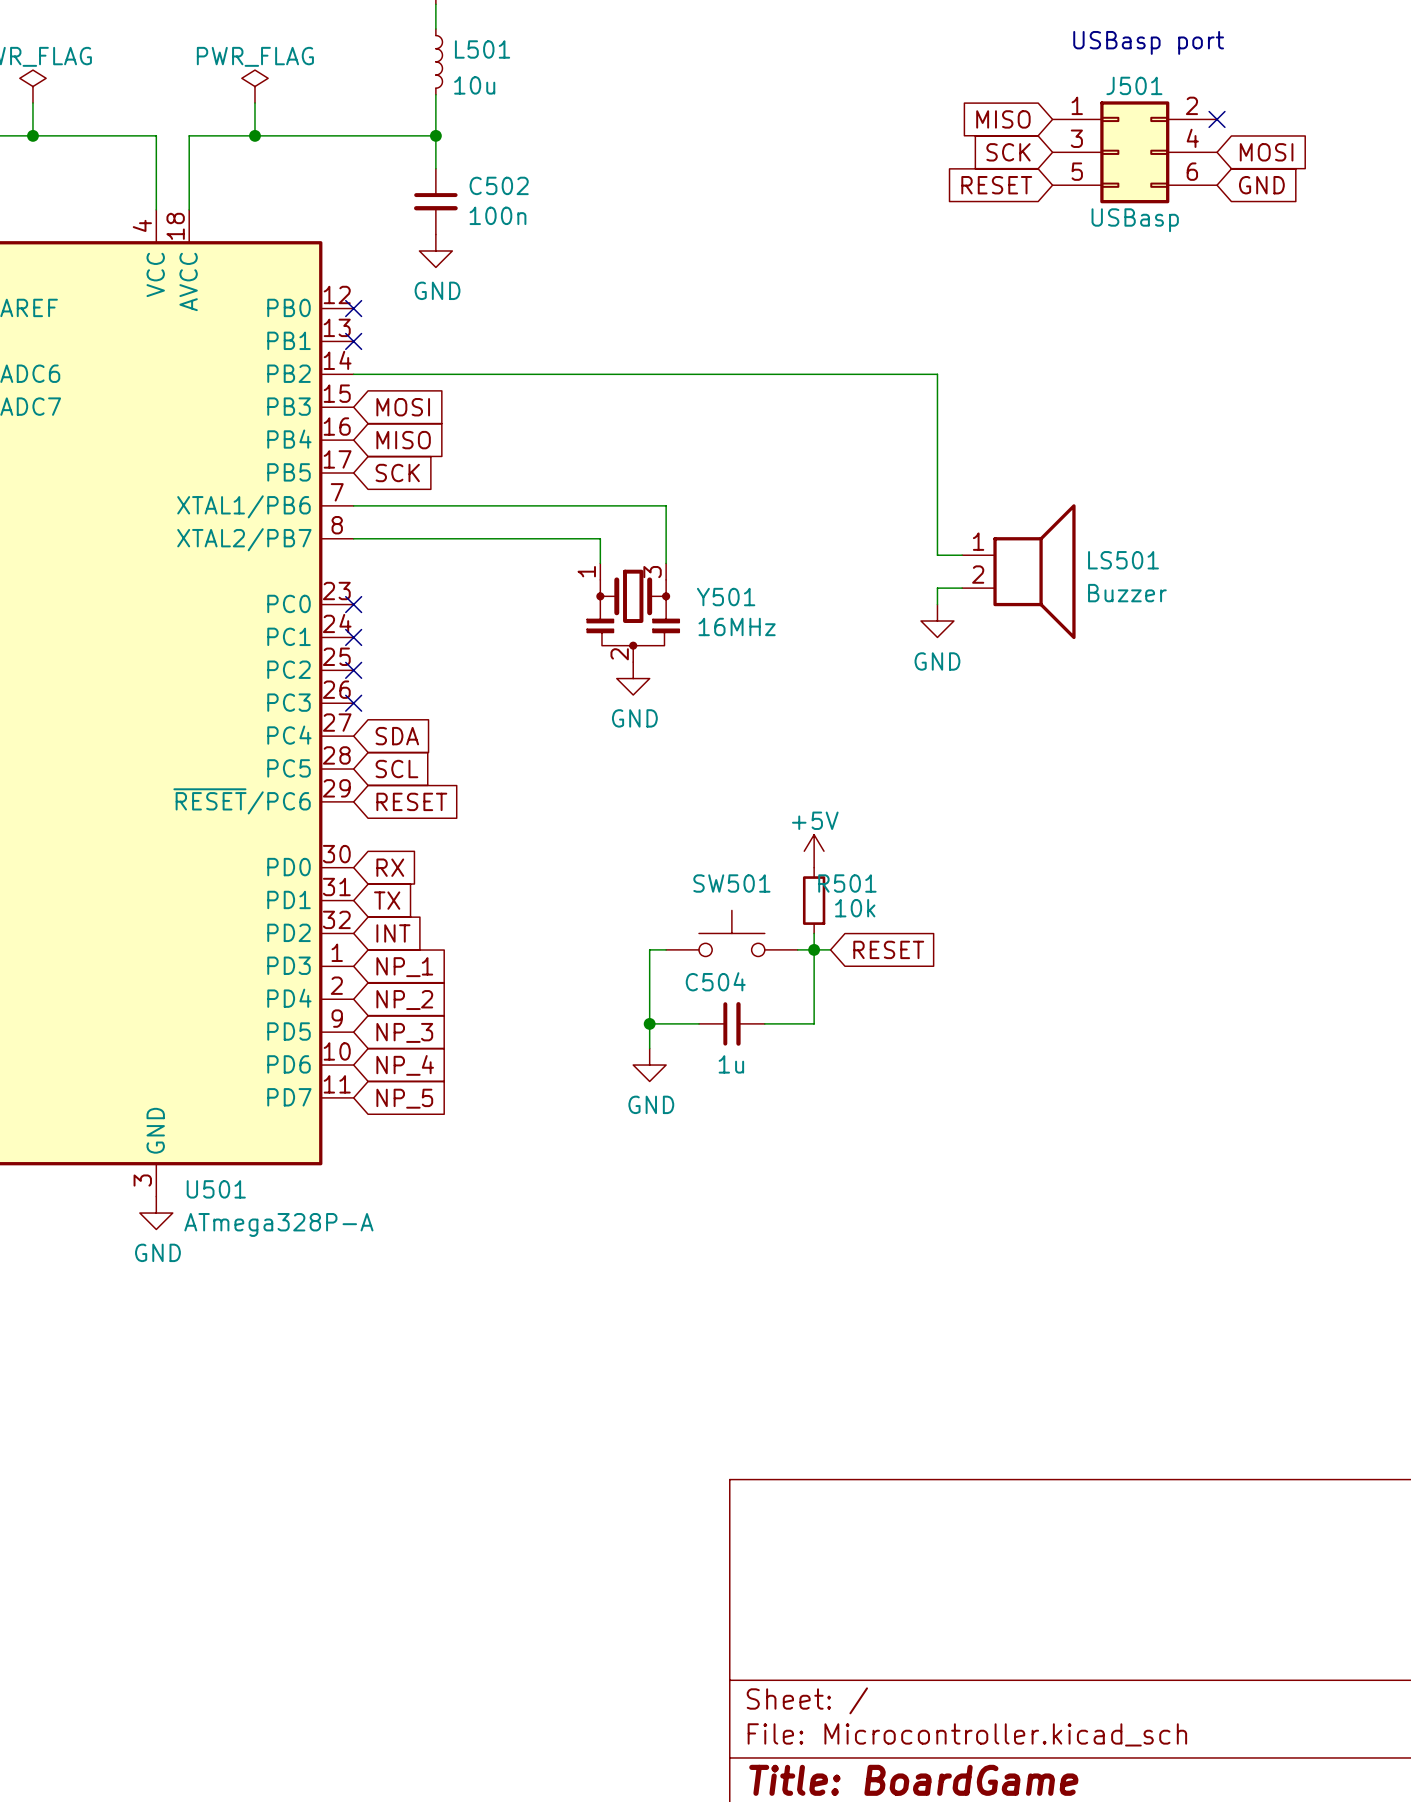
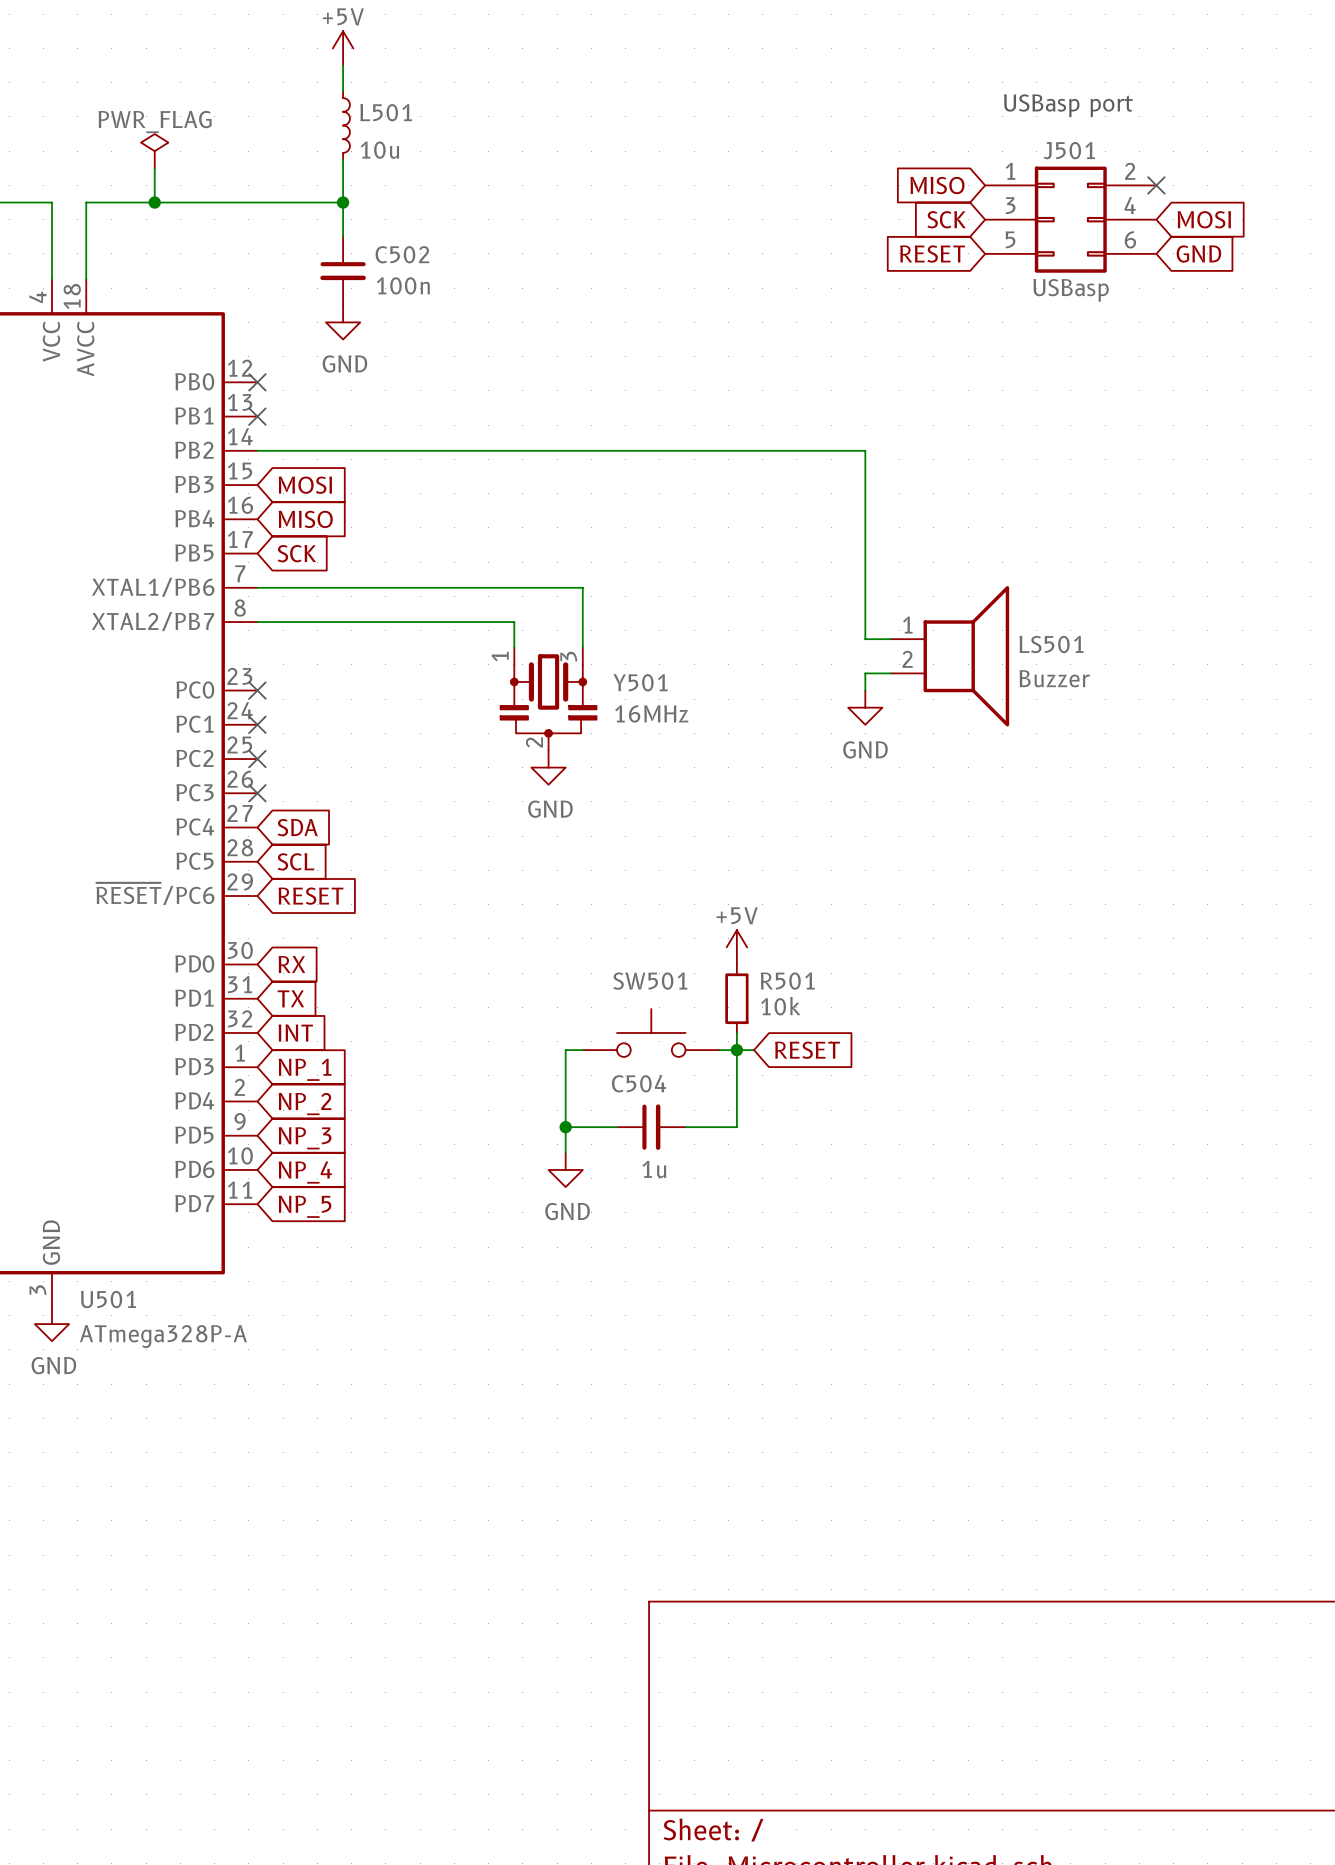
R501 name position: R501 (847, 883) -> R501 (787, 981)

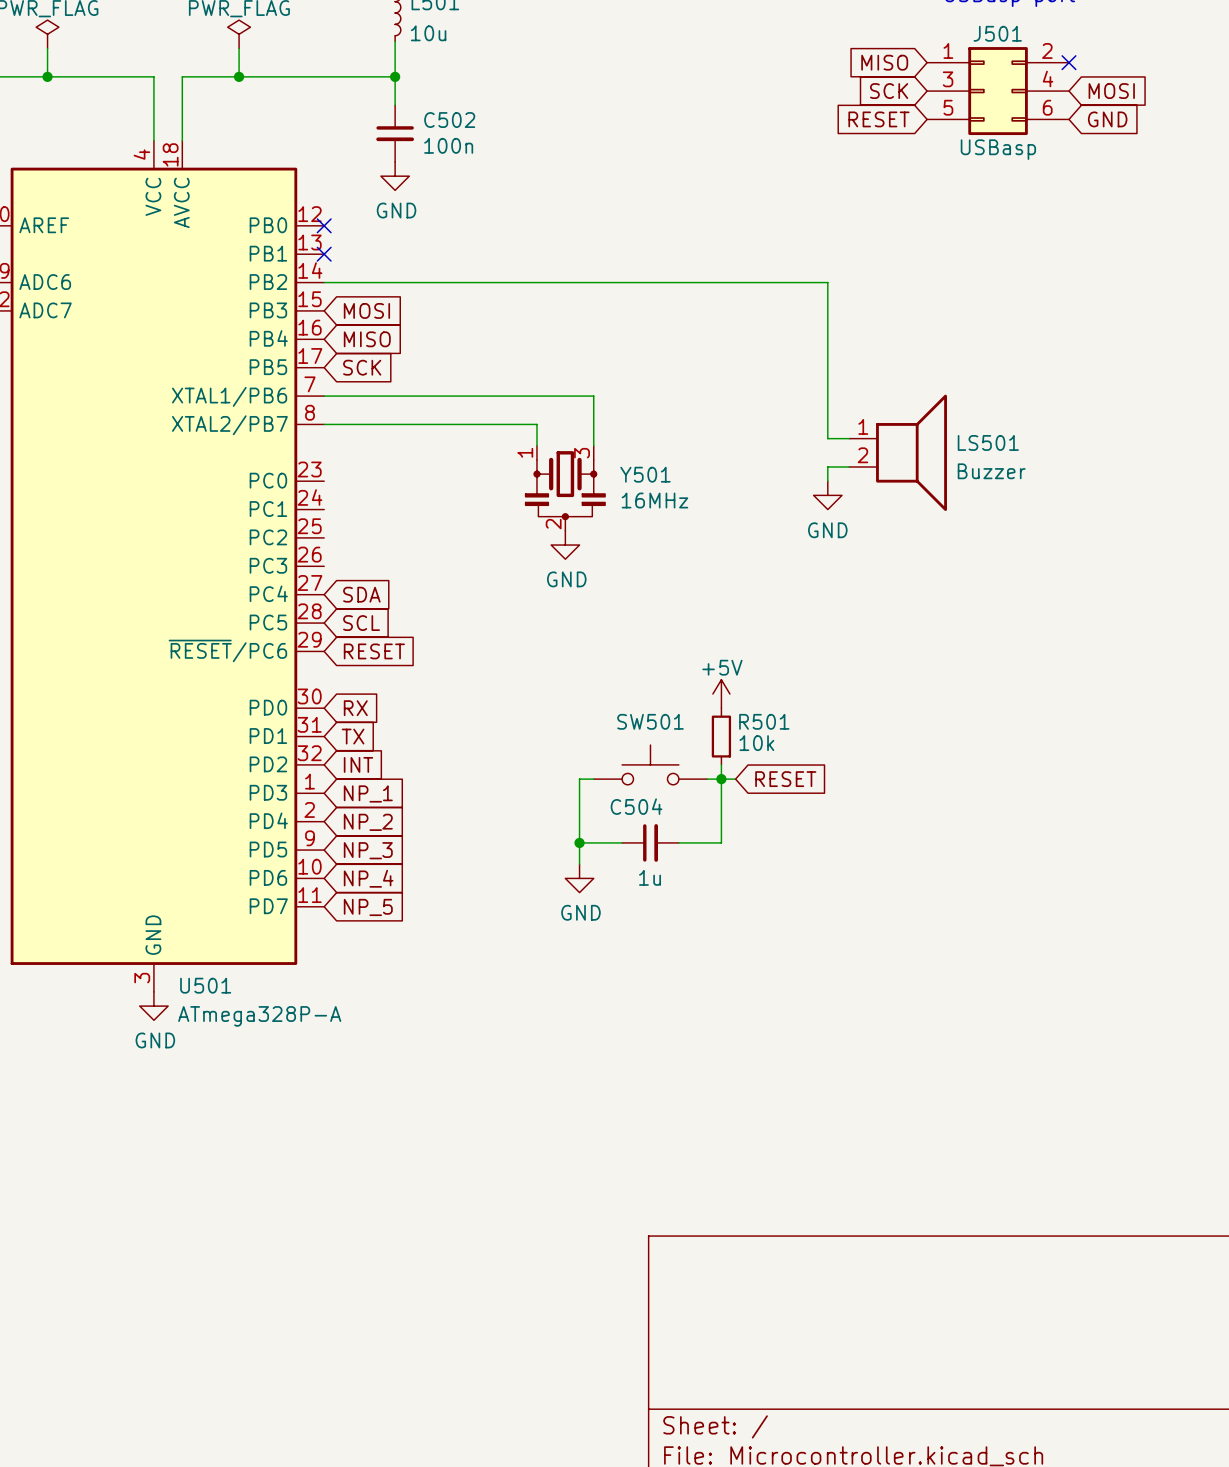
no-connect mark: (257, 690) -> none
no-connect mark: (257, 724) -> none
no-connect mark: (257, 759) -> none
no-connect mark: (257, 793) -> none

